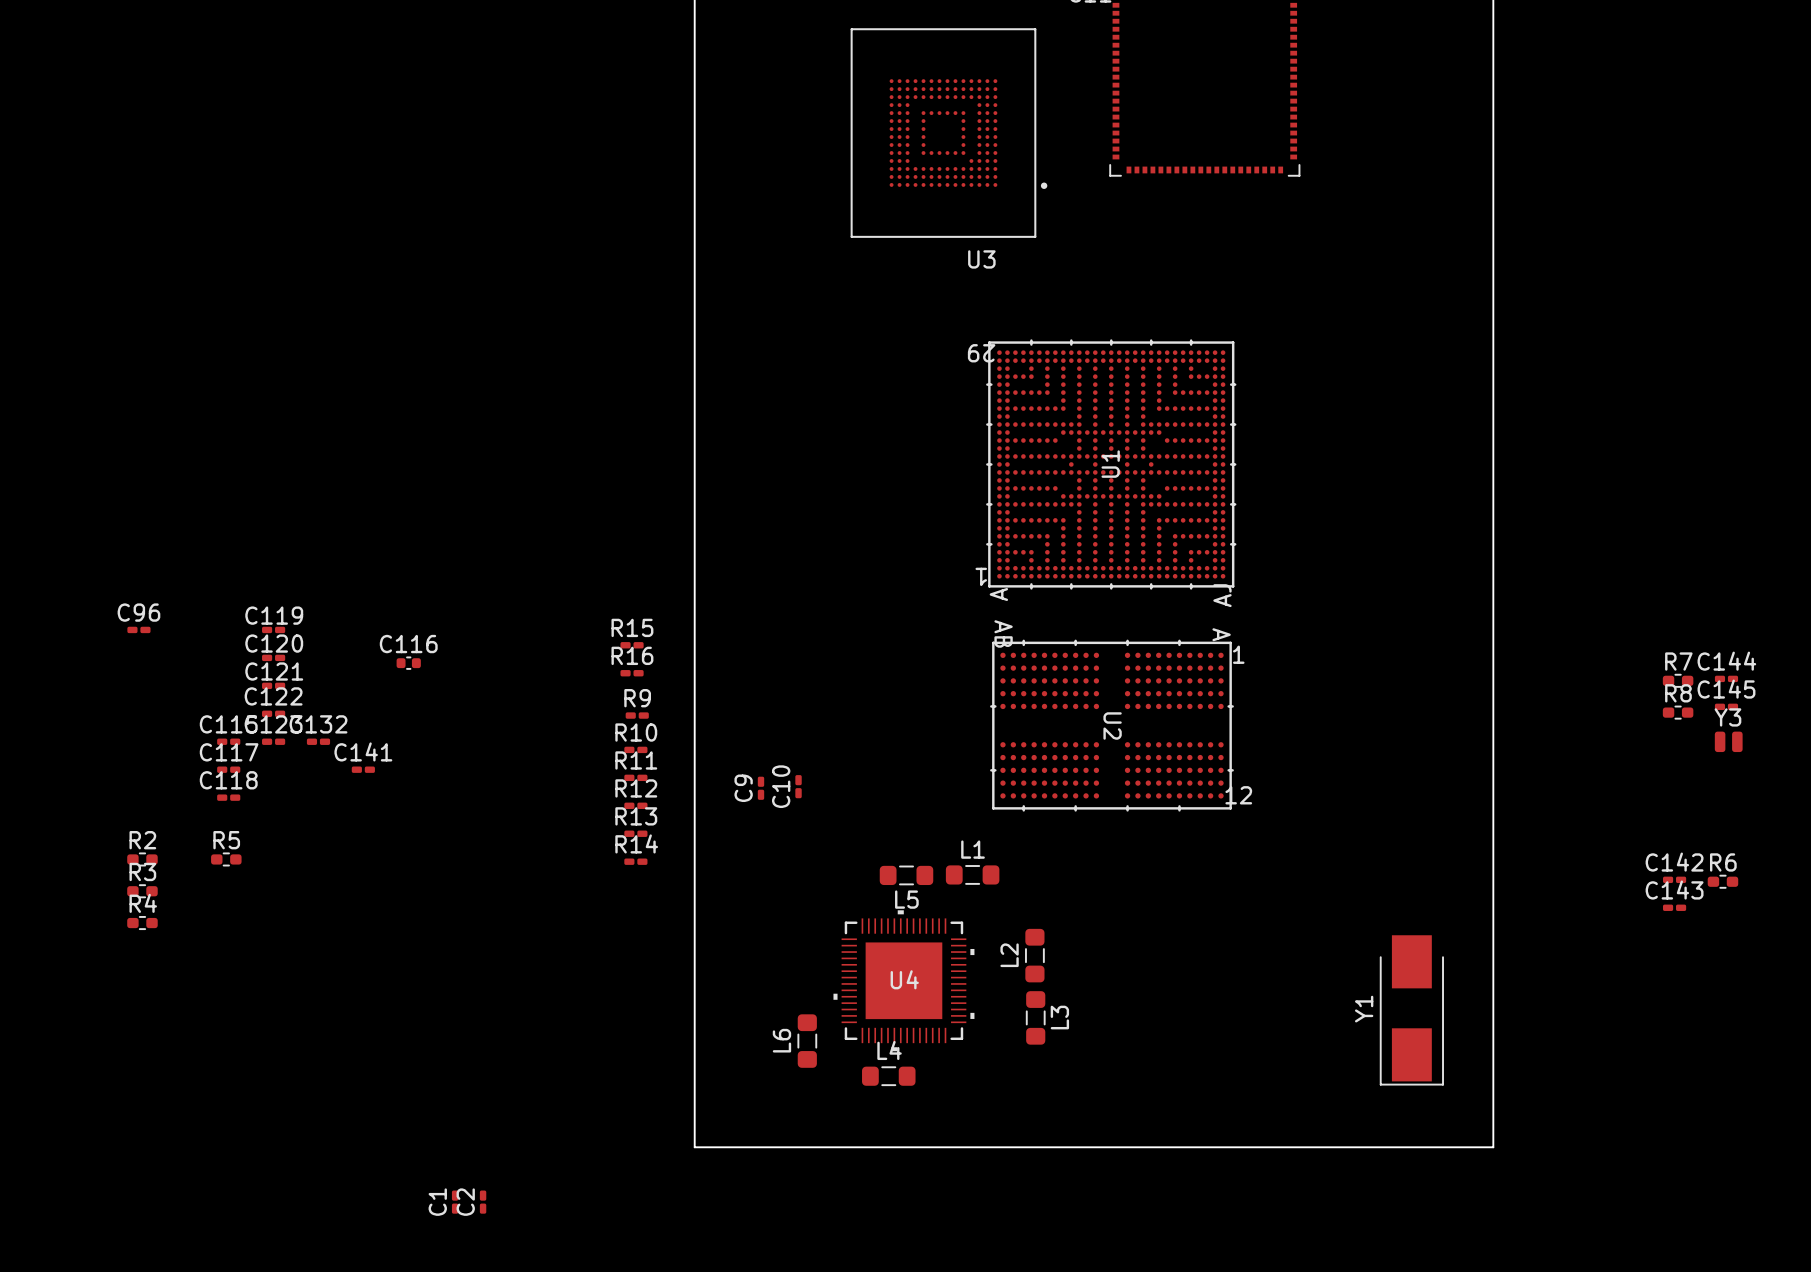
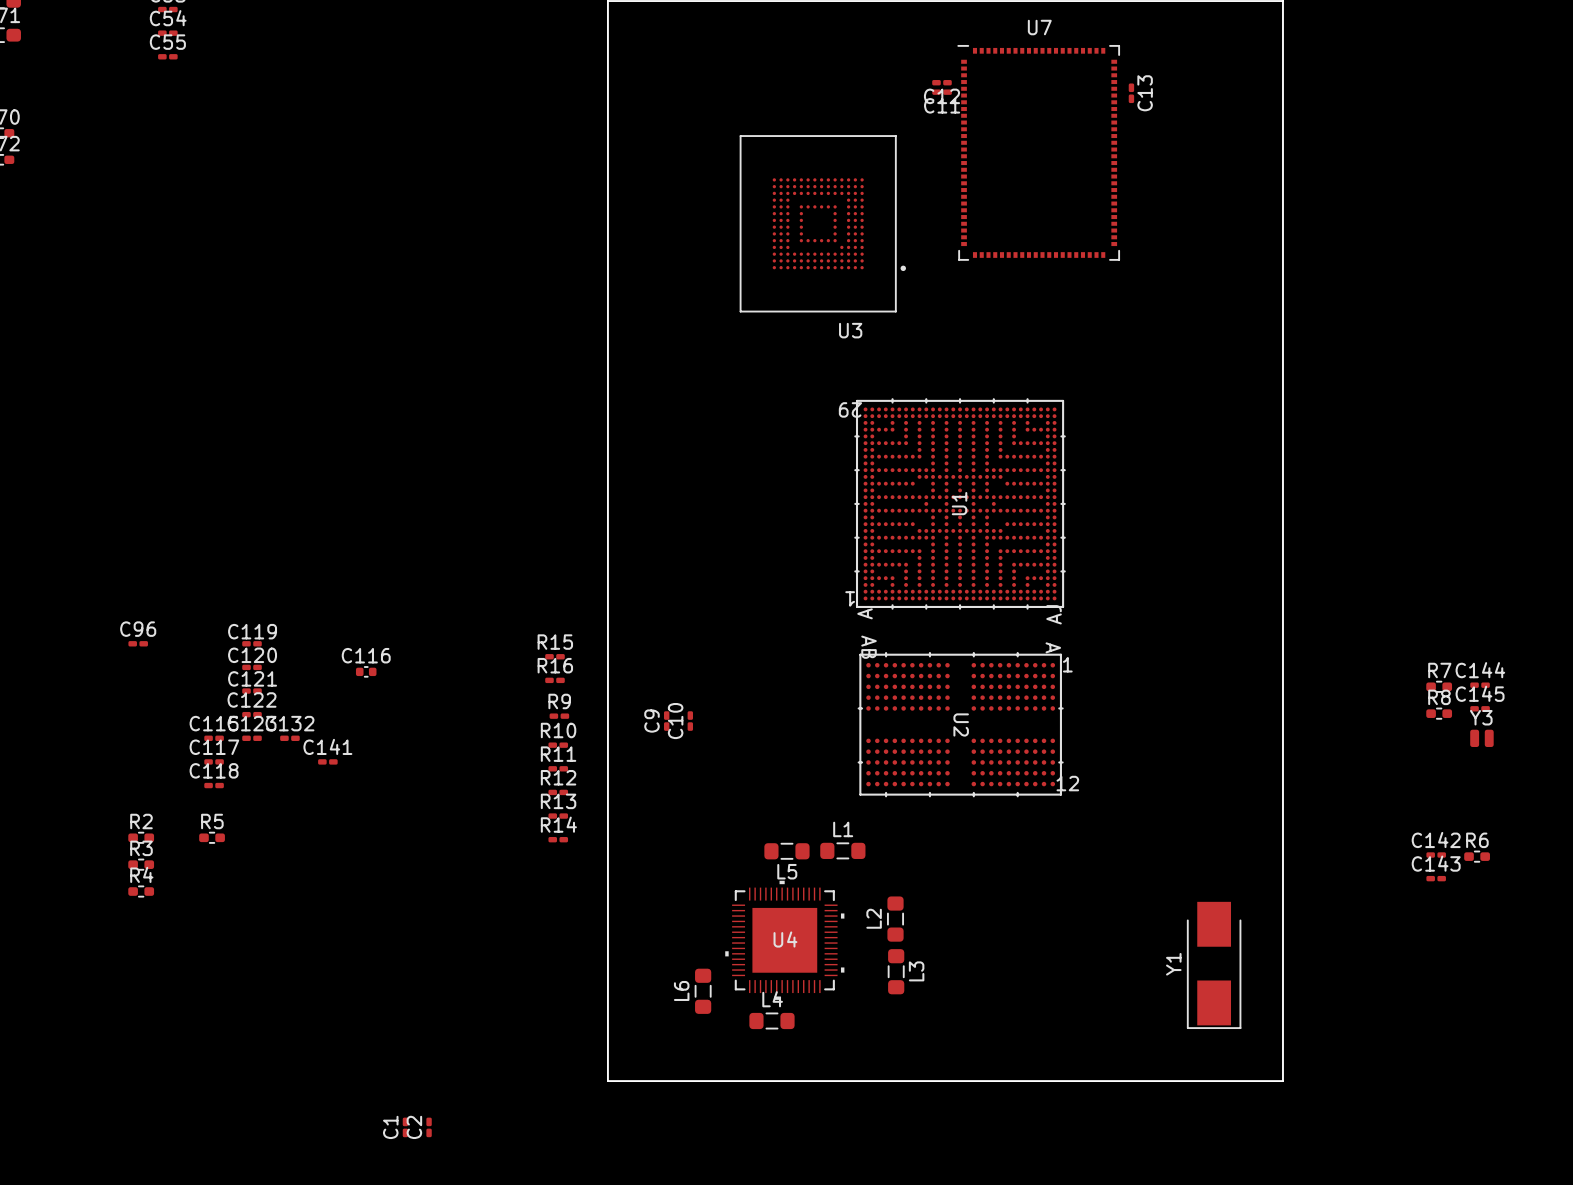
C10 position: (798, 786) -> (690, 721)
C9 position: (760, 788) -> (666, 721)

